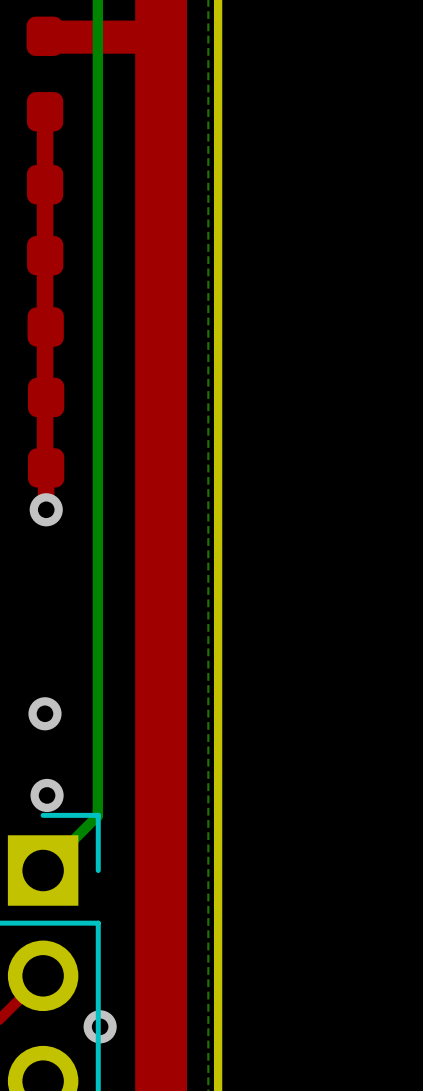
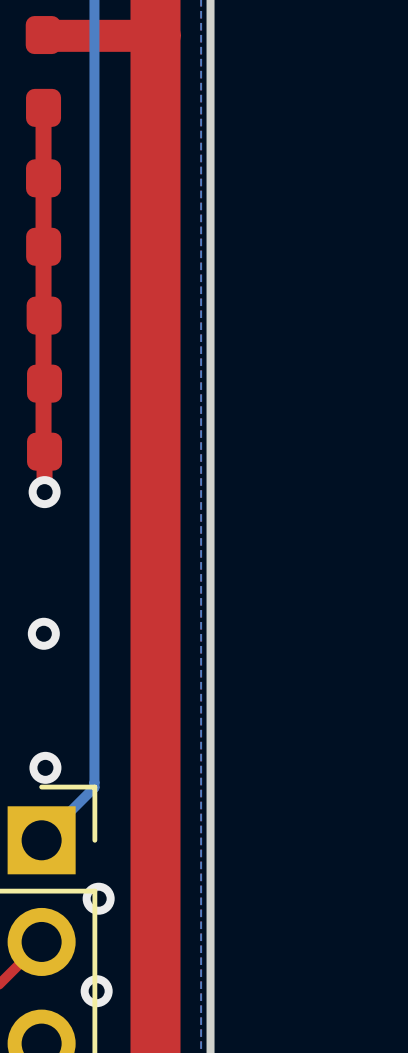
via position: (44, 713) -> (43, 633)
via: none -> (98, 898)

